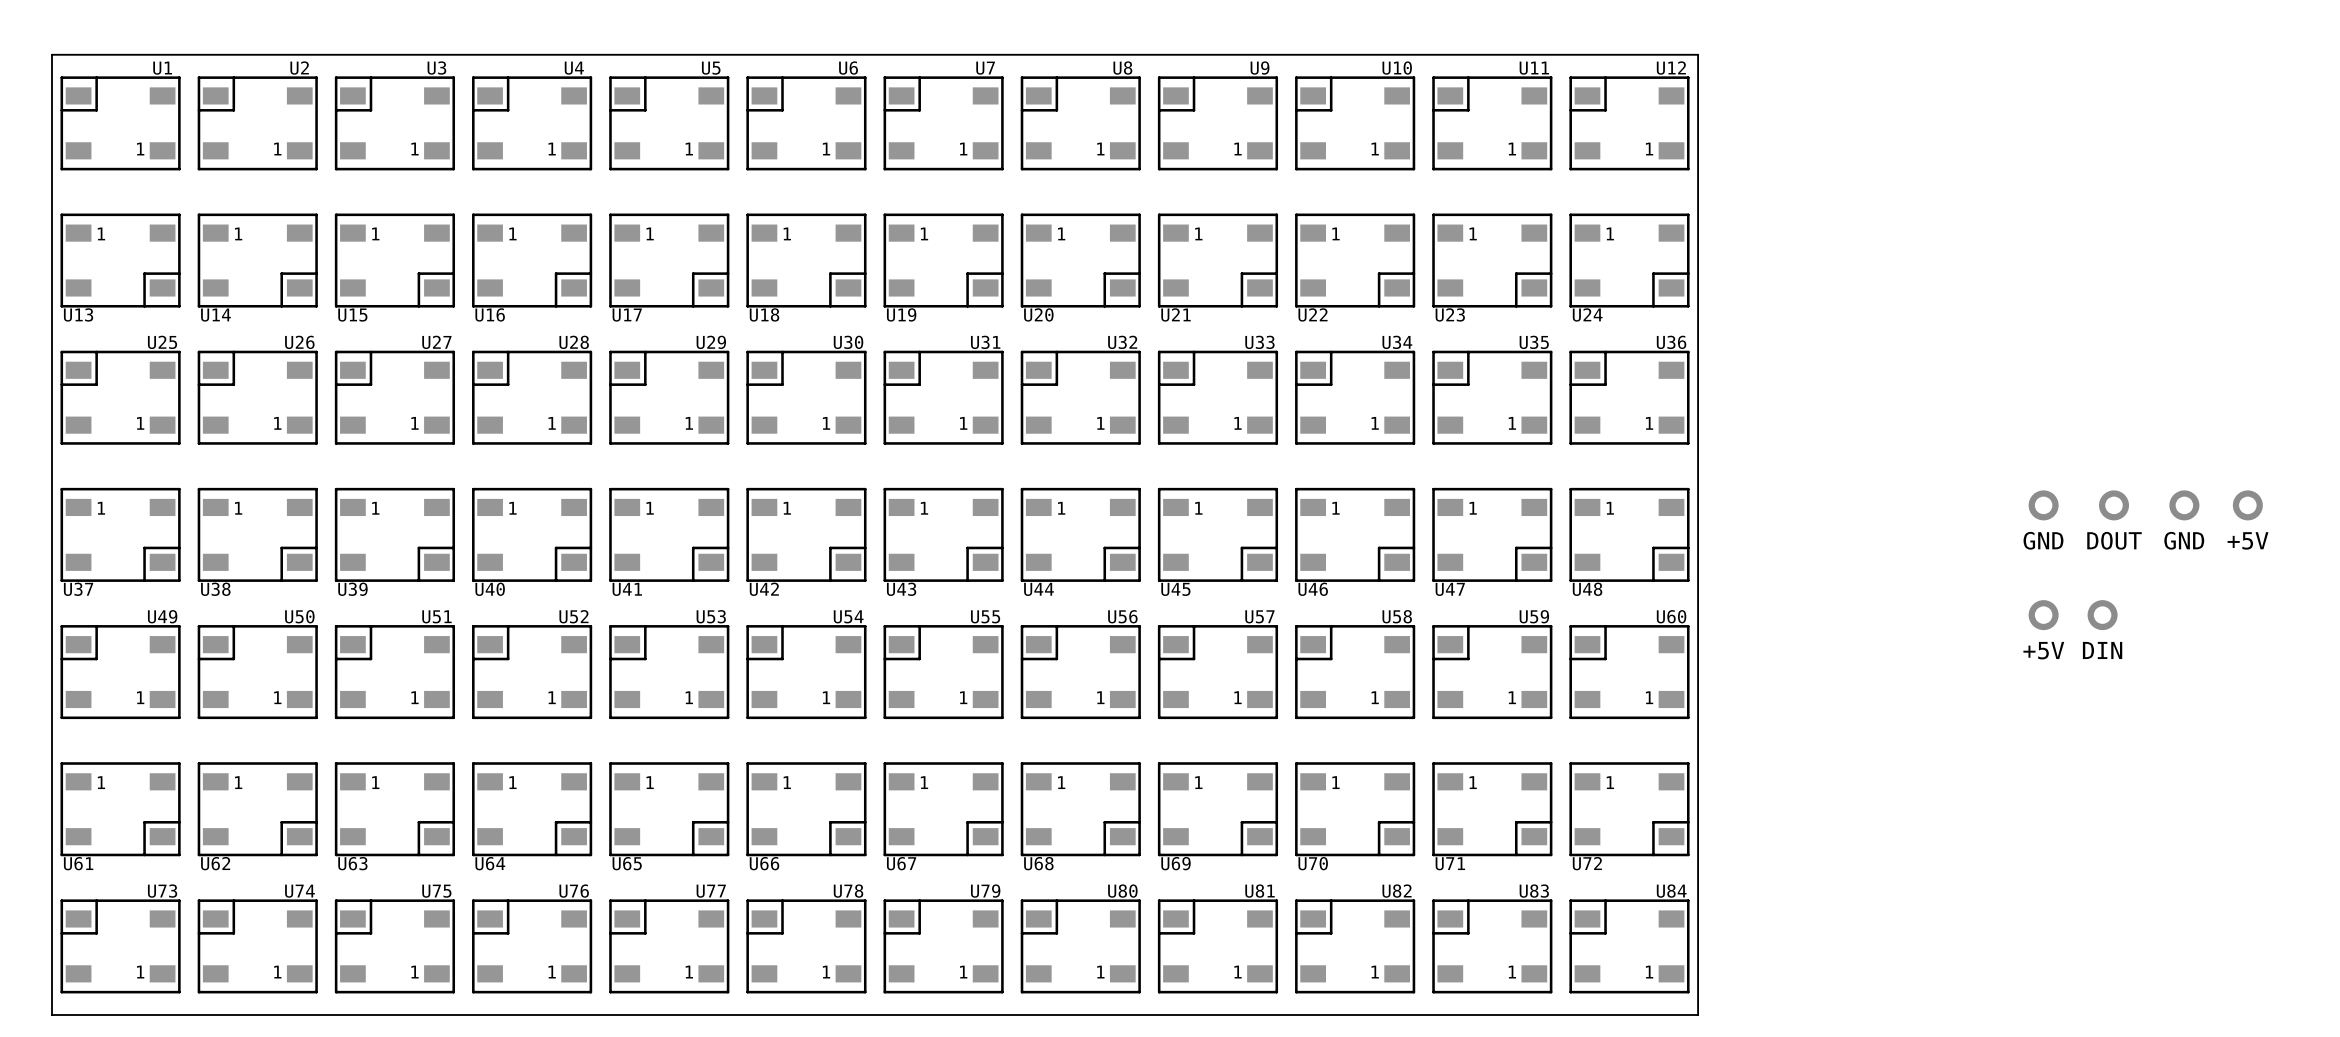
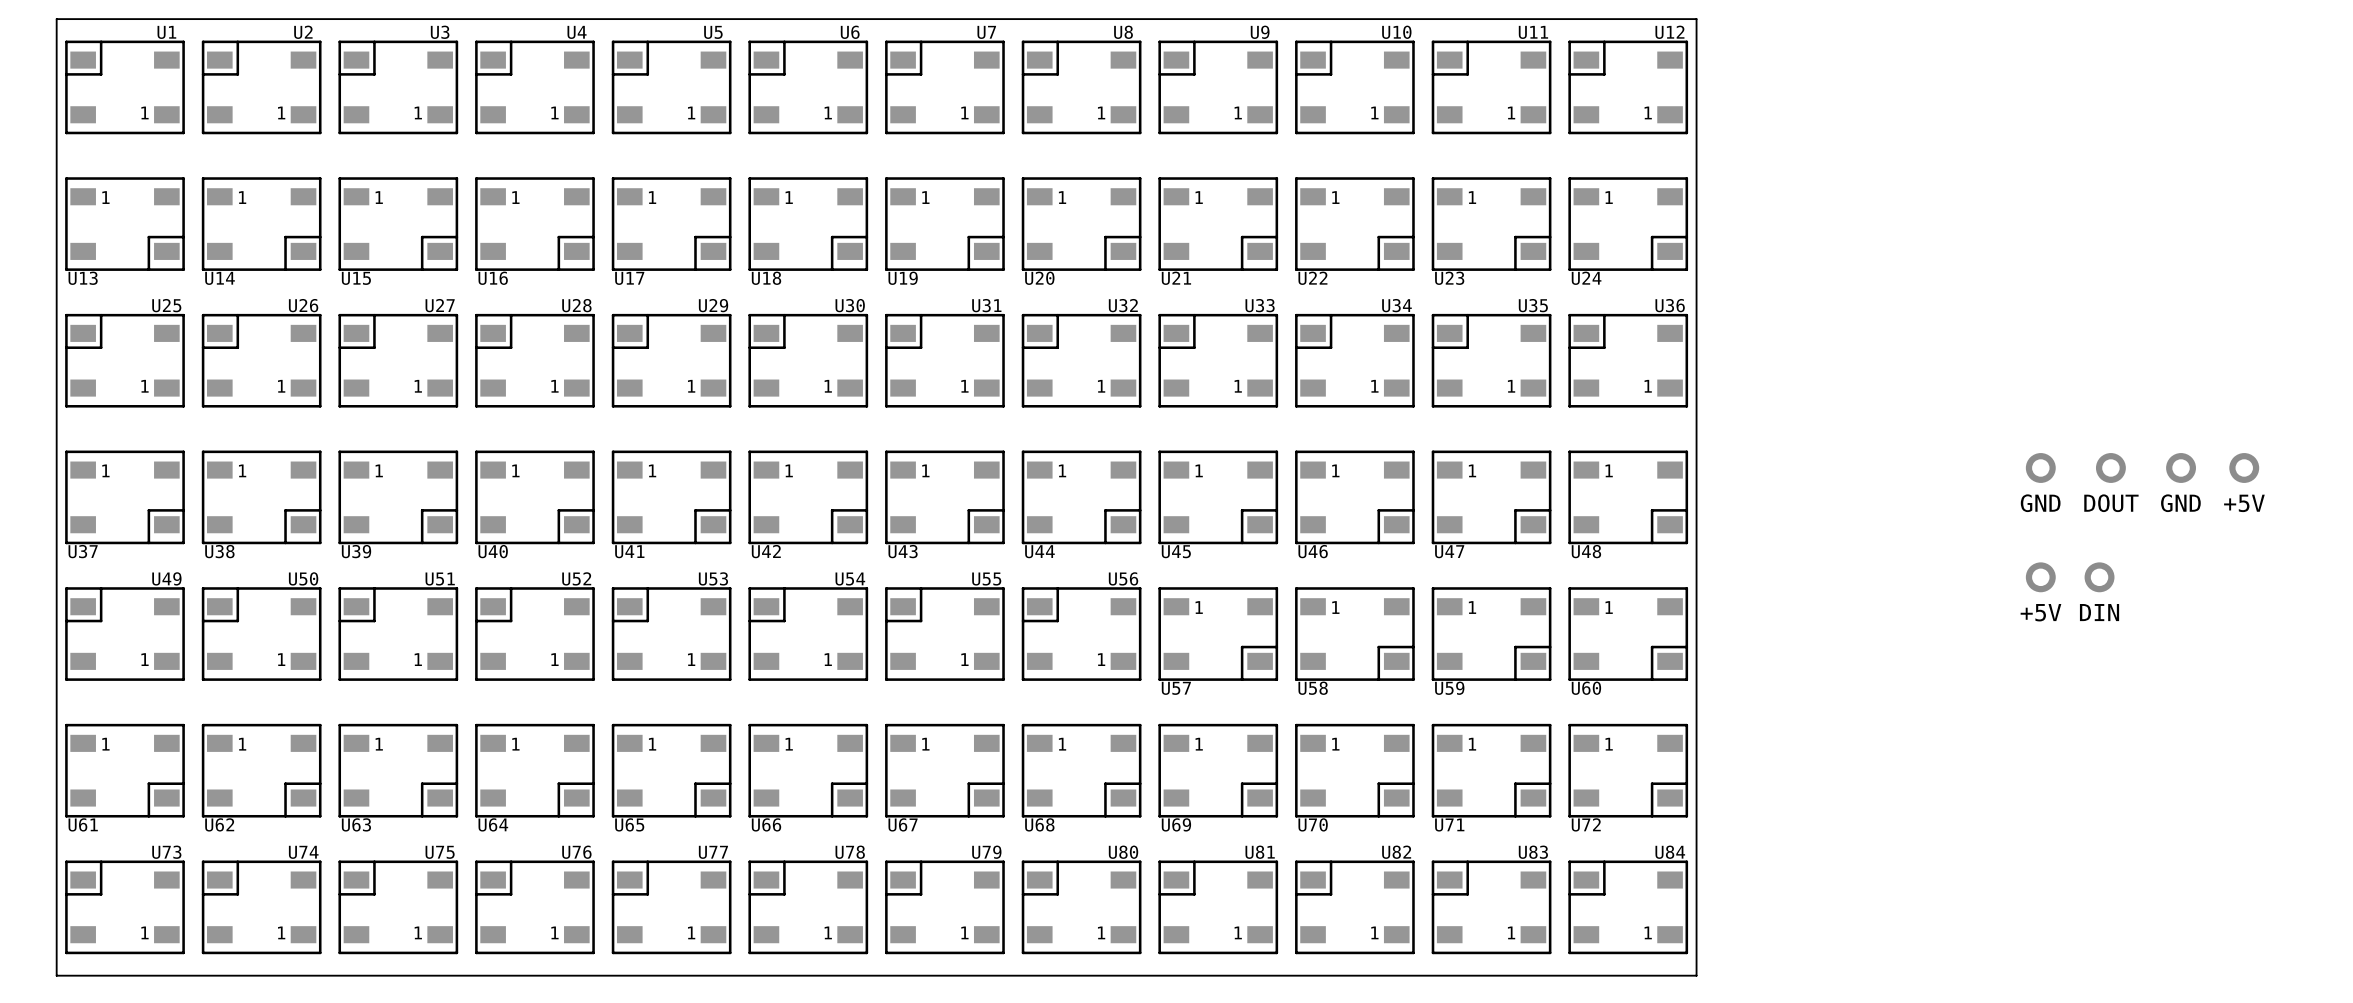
U57 rotation: 0° (1217, 672) -> 180° (1218, 634)
U58 rotation: 0° (1355, 672) -> 180° (1354, 634)
U59 rotation: 0° (1492, 672) -> 180° (1491, 634)
U60 rotation: 0° (1629, 672) -> 180° (1628, 634)

